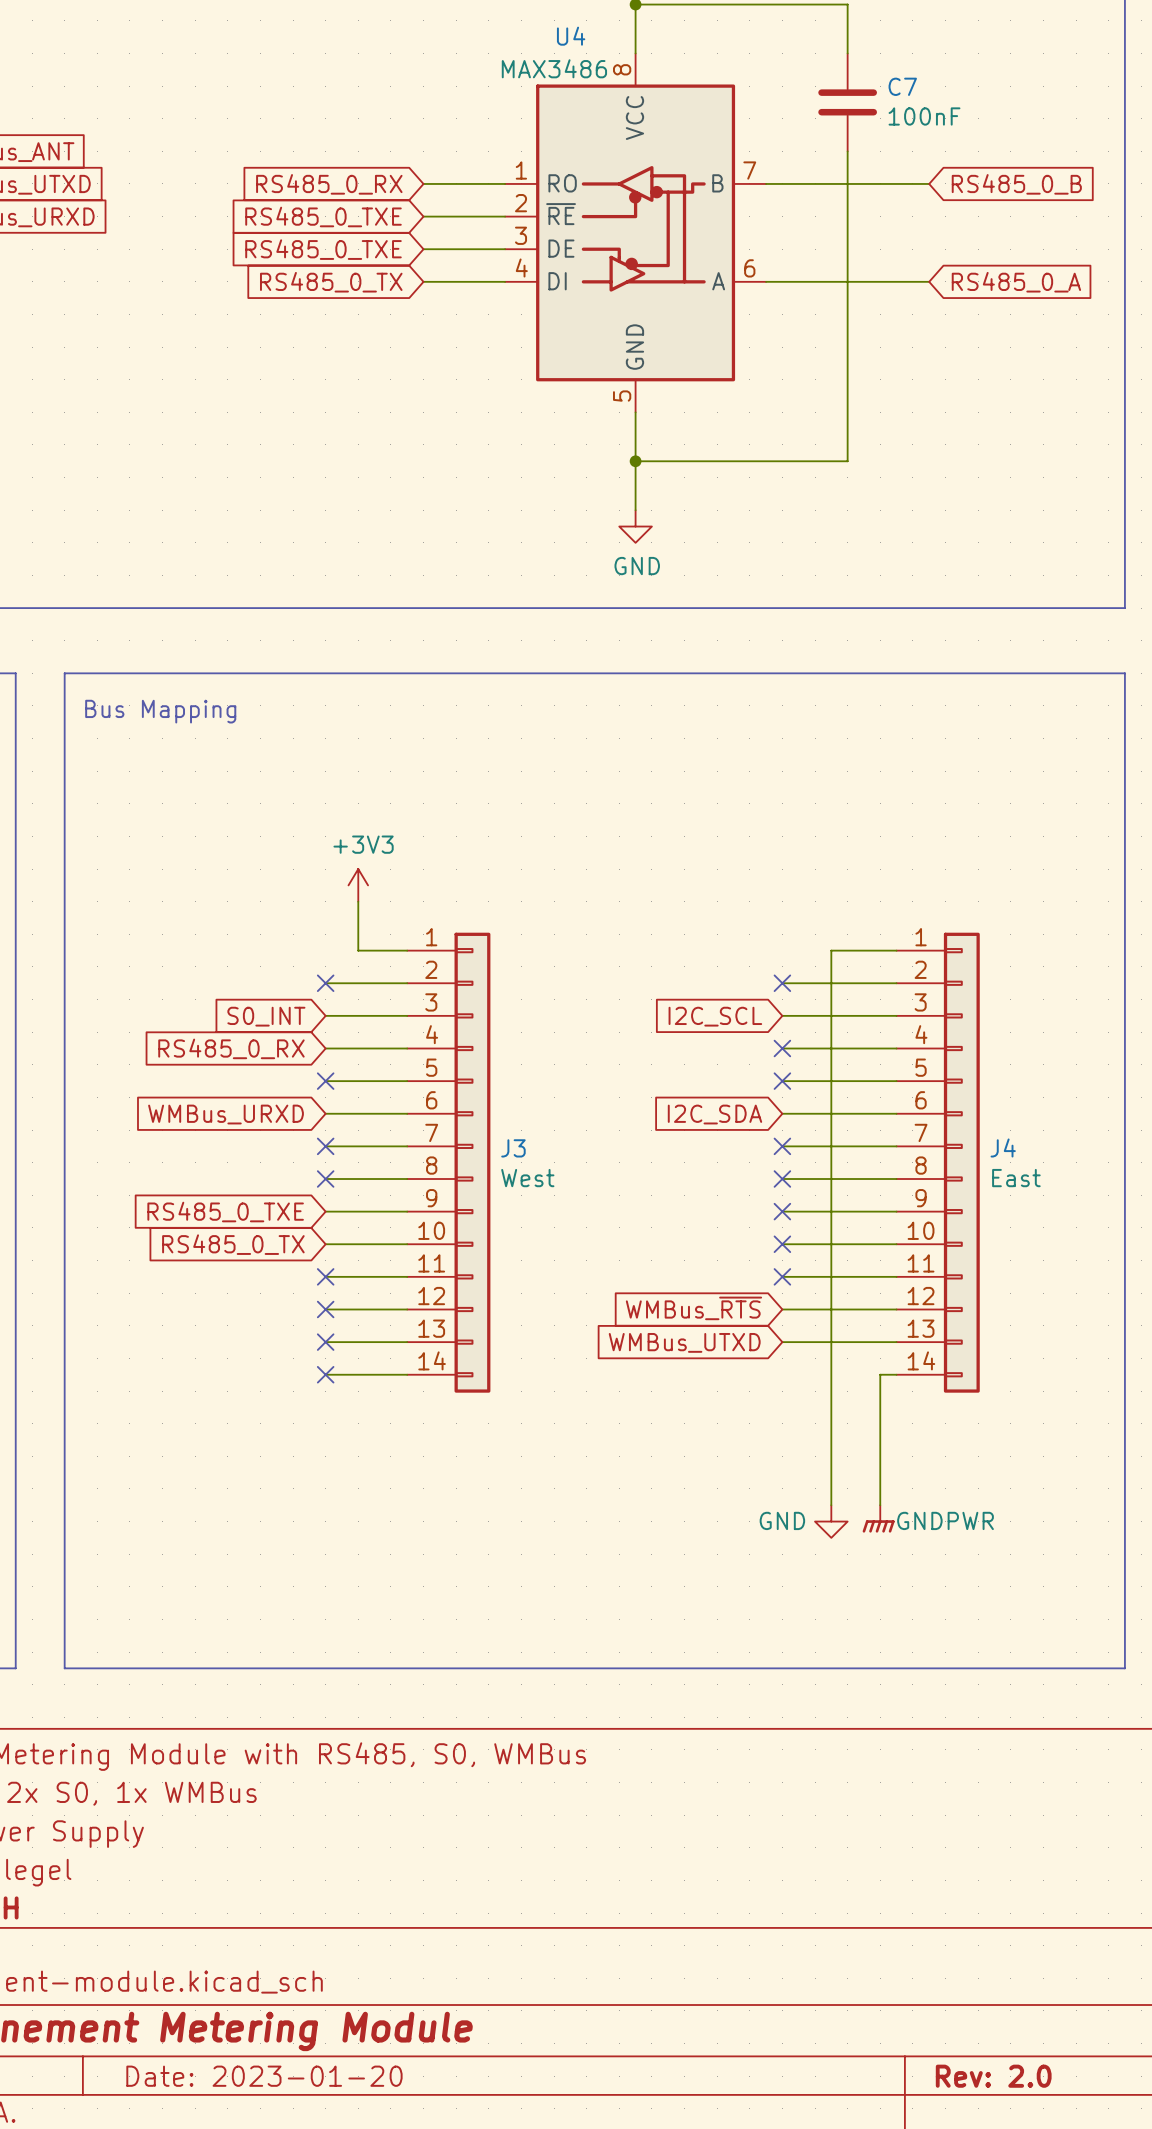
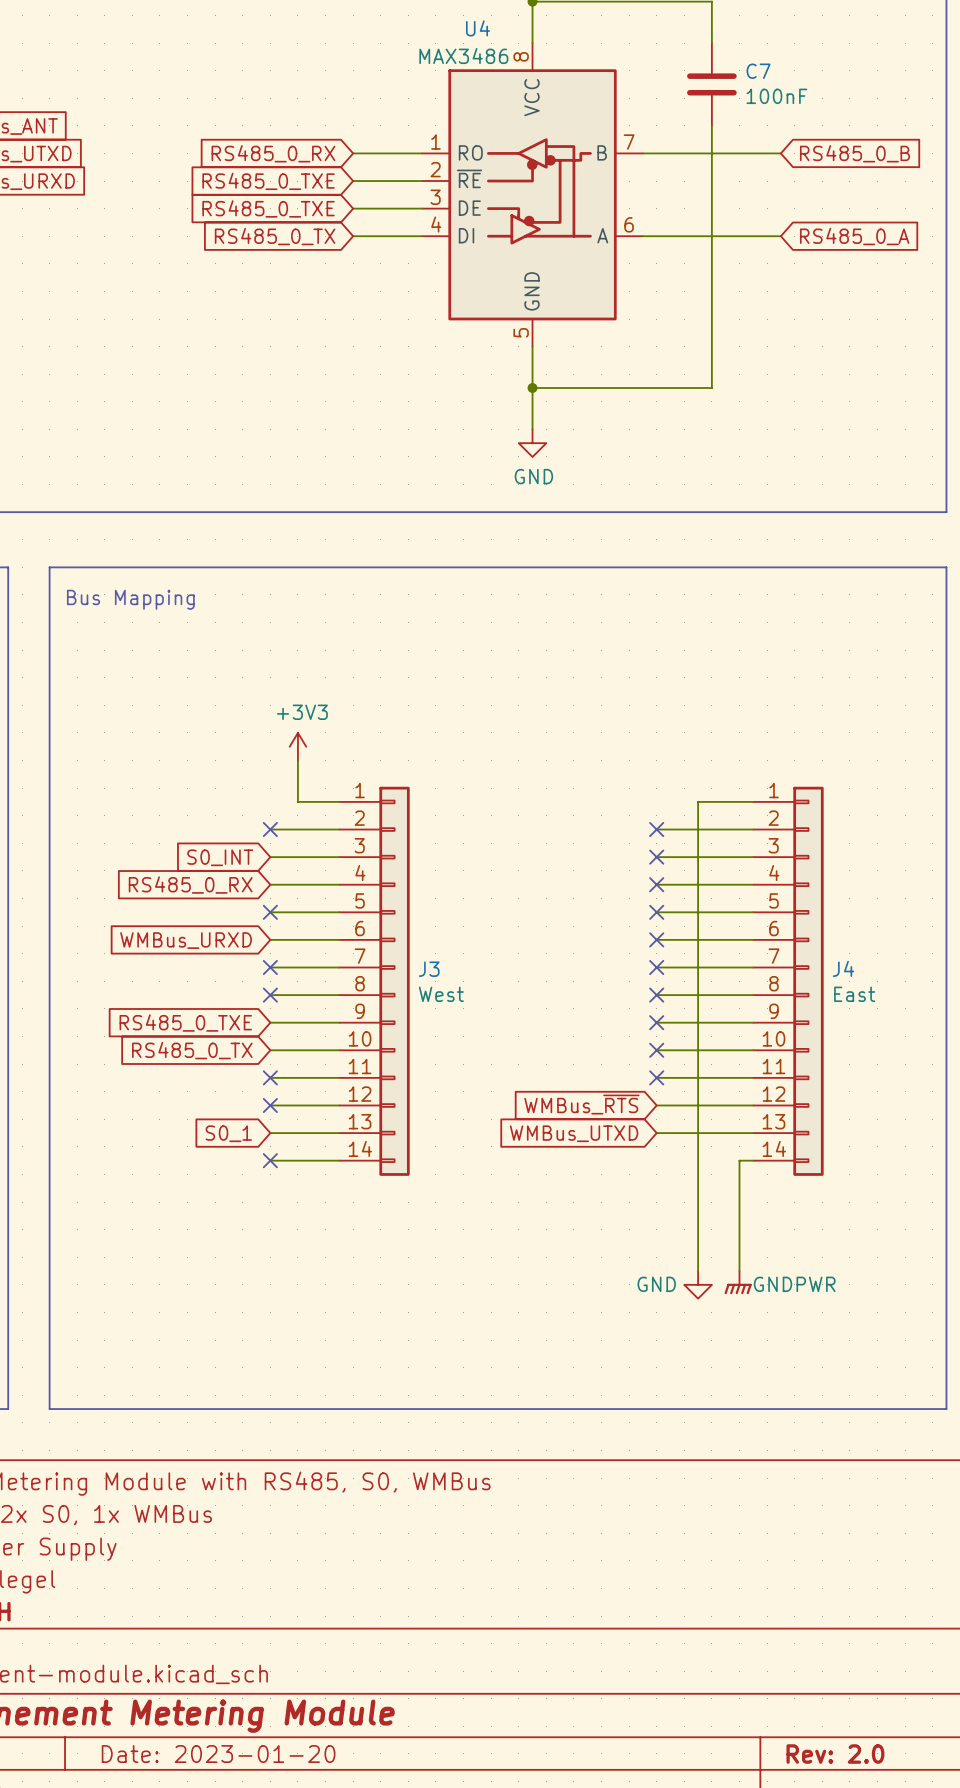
no-connect mark: none -> (656, 857)
global label: I2C_SCL (715, 1016) -> none
no-connect mark: none -> (656, 939)
global label: I2C_SDA (714, 1114) -> none
global label: none -> S0_1 (228, 1133)
no-connect mark: (325, 1342) -> none

